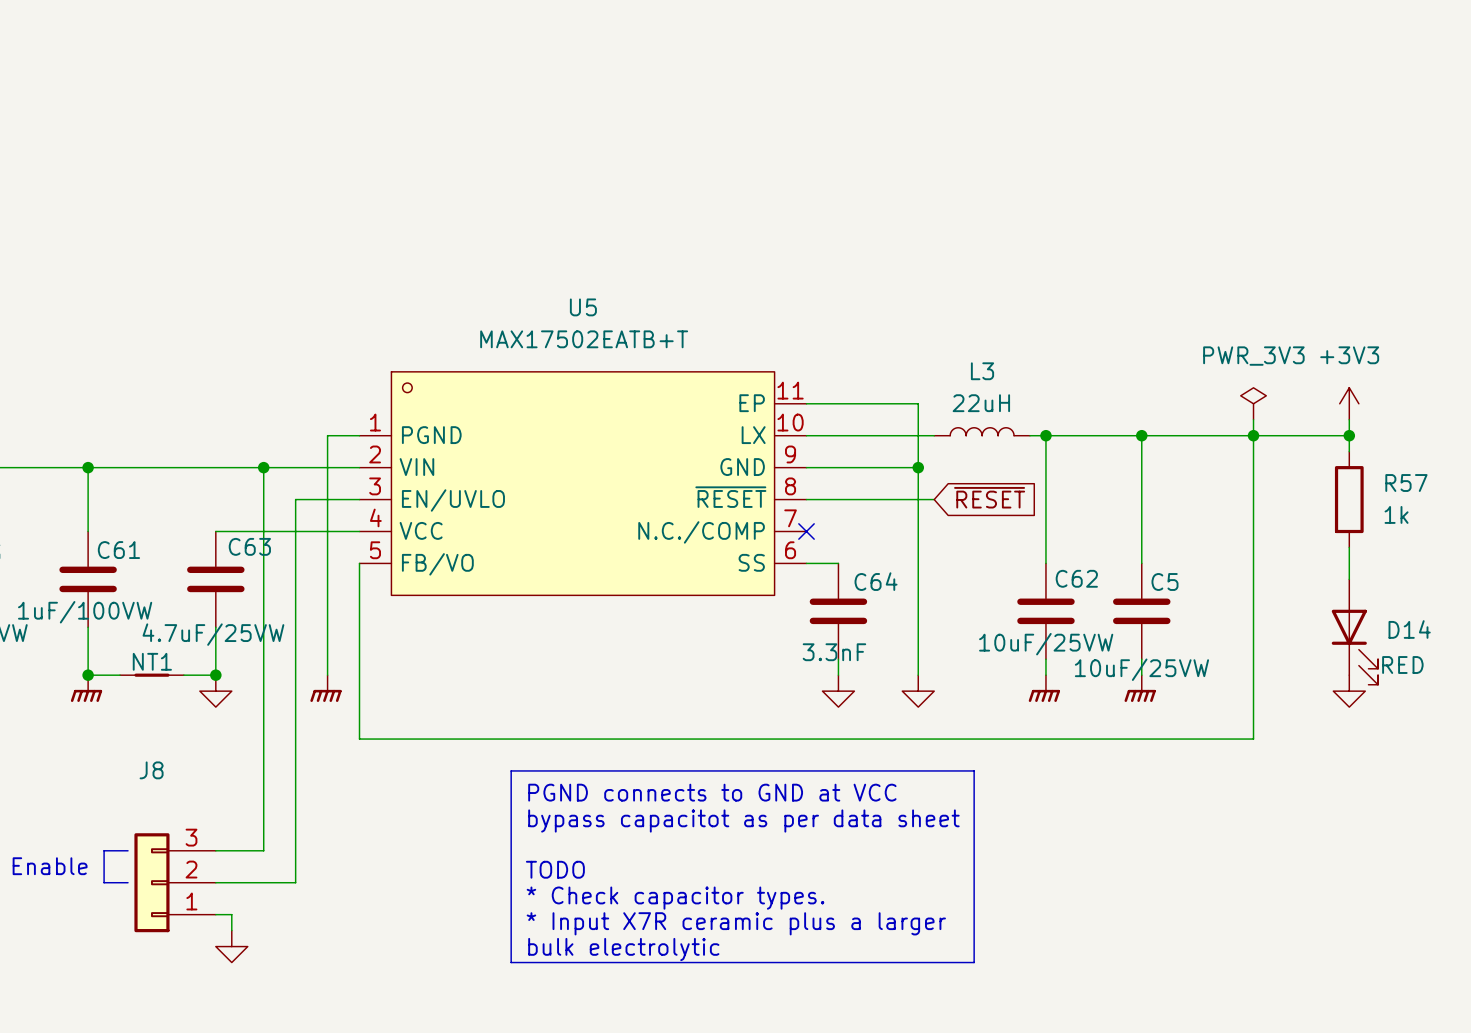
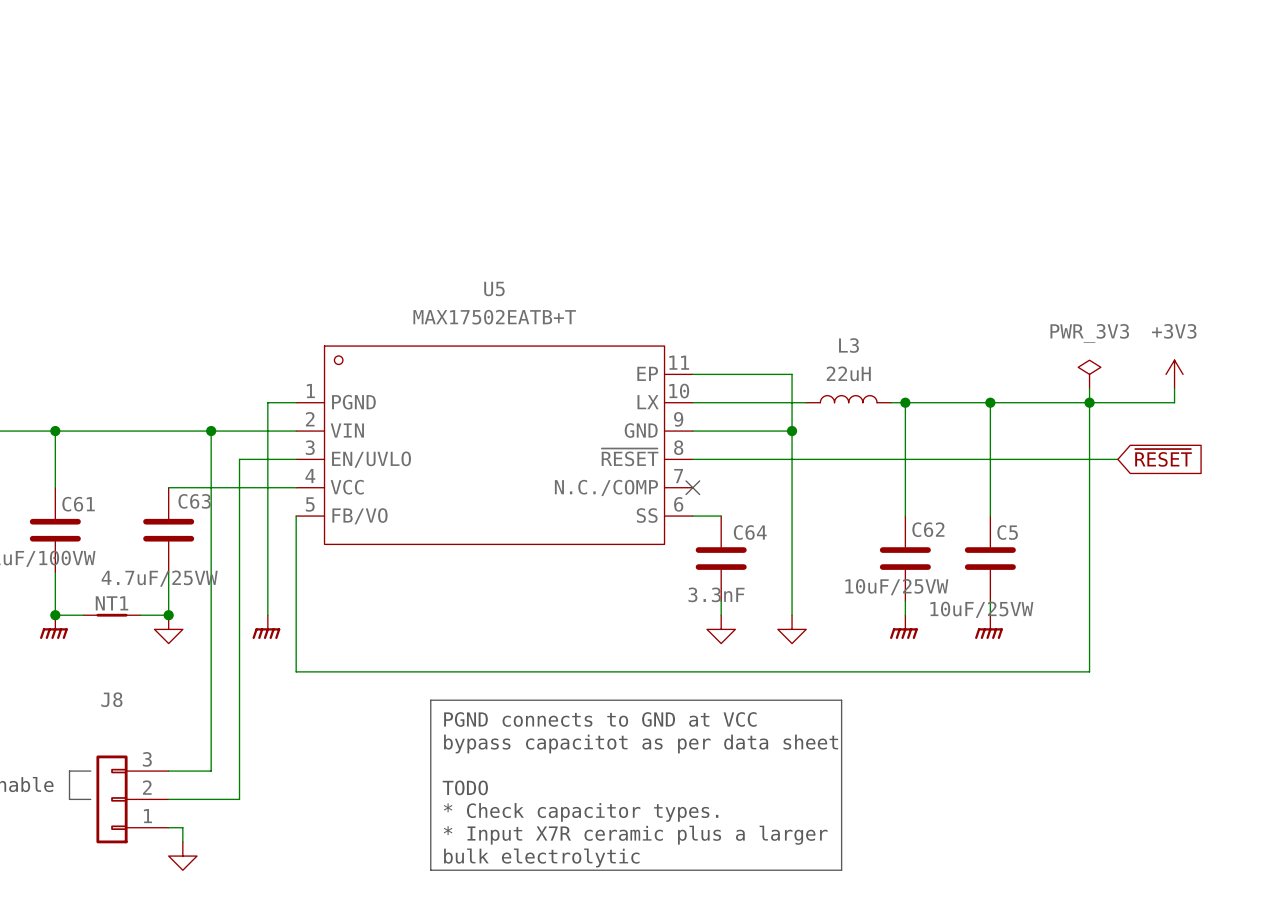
wire: (1349, 435) (1349, 451) -> none
junction: (1349, 435) -> none
global label: ~{RESET} (989, 497) -> none
global label: none -> ~{RESET} (1163, 457)
wire: none -> (806, 459) (1117, 459)
R57: 1k (1349, 499) -> none
wire: (1349, 547) (1349, 579) -> none
D14: RED (1354, 632) -> none
power symbol: (1349, 691) -> none

